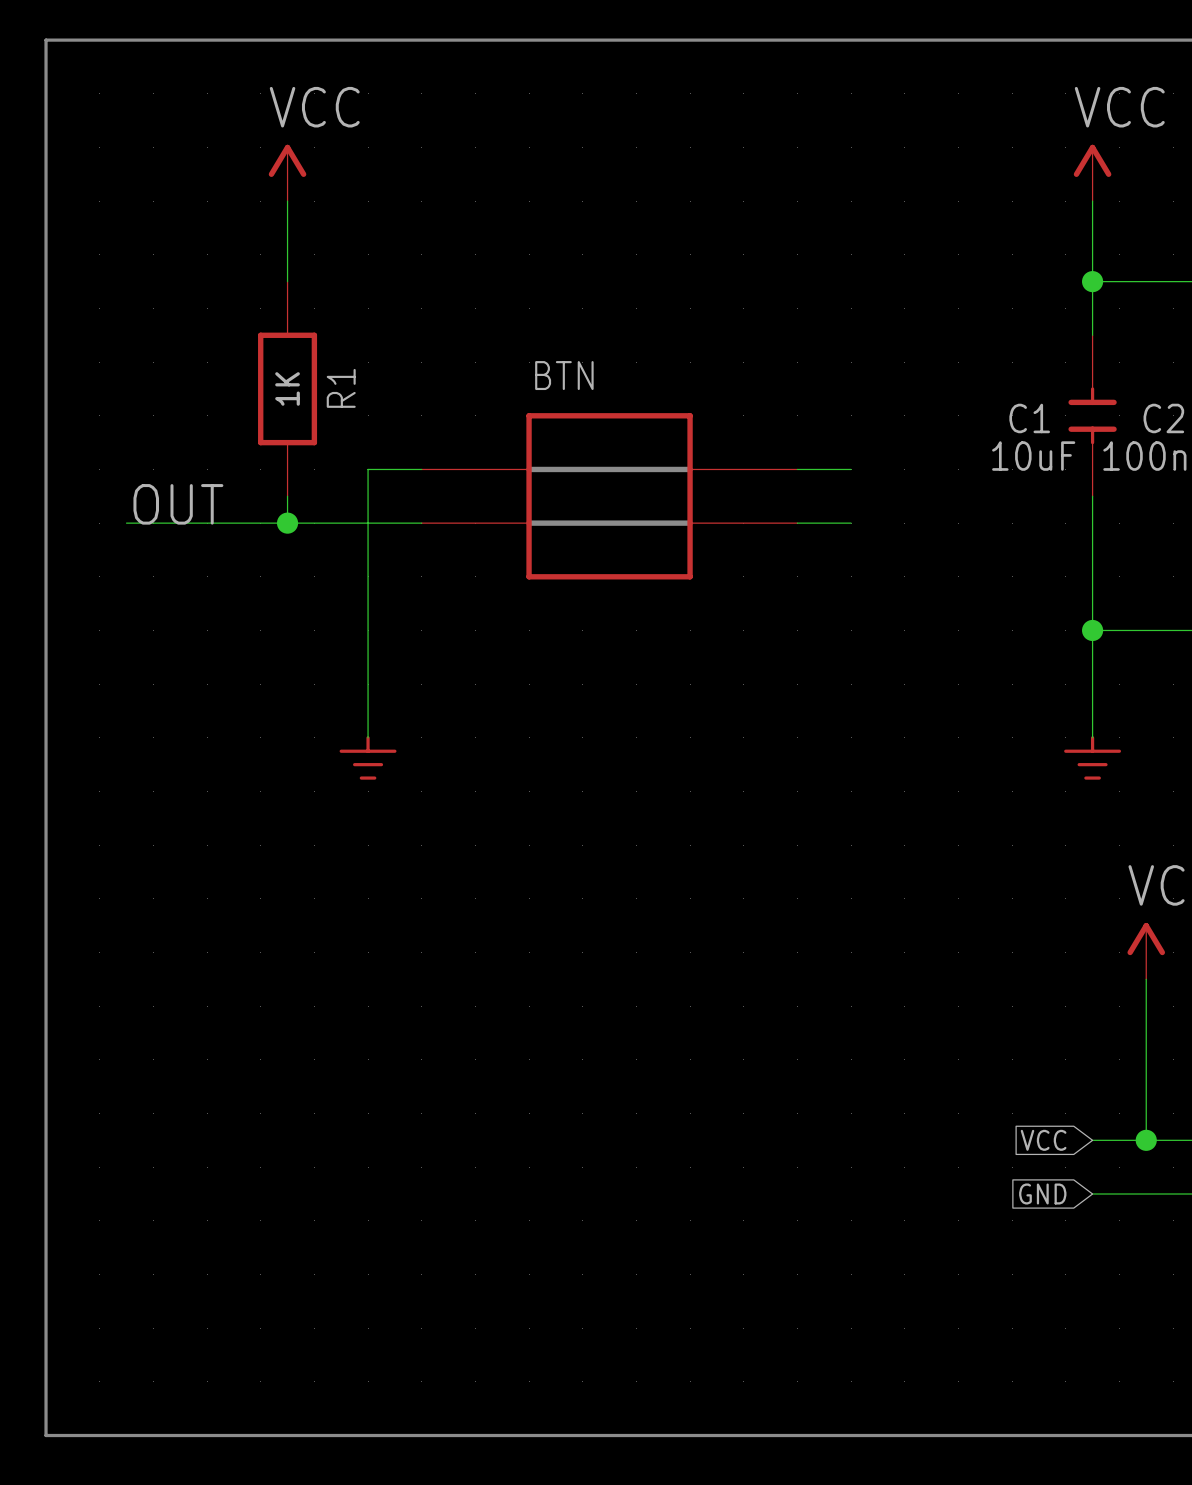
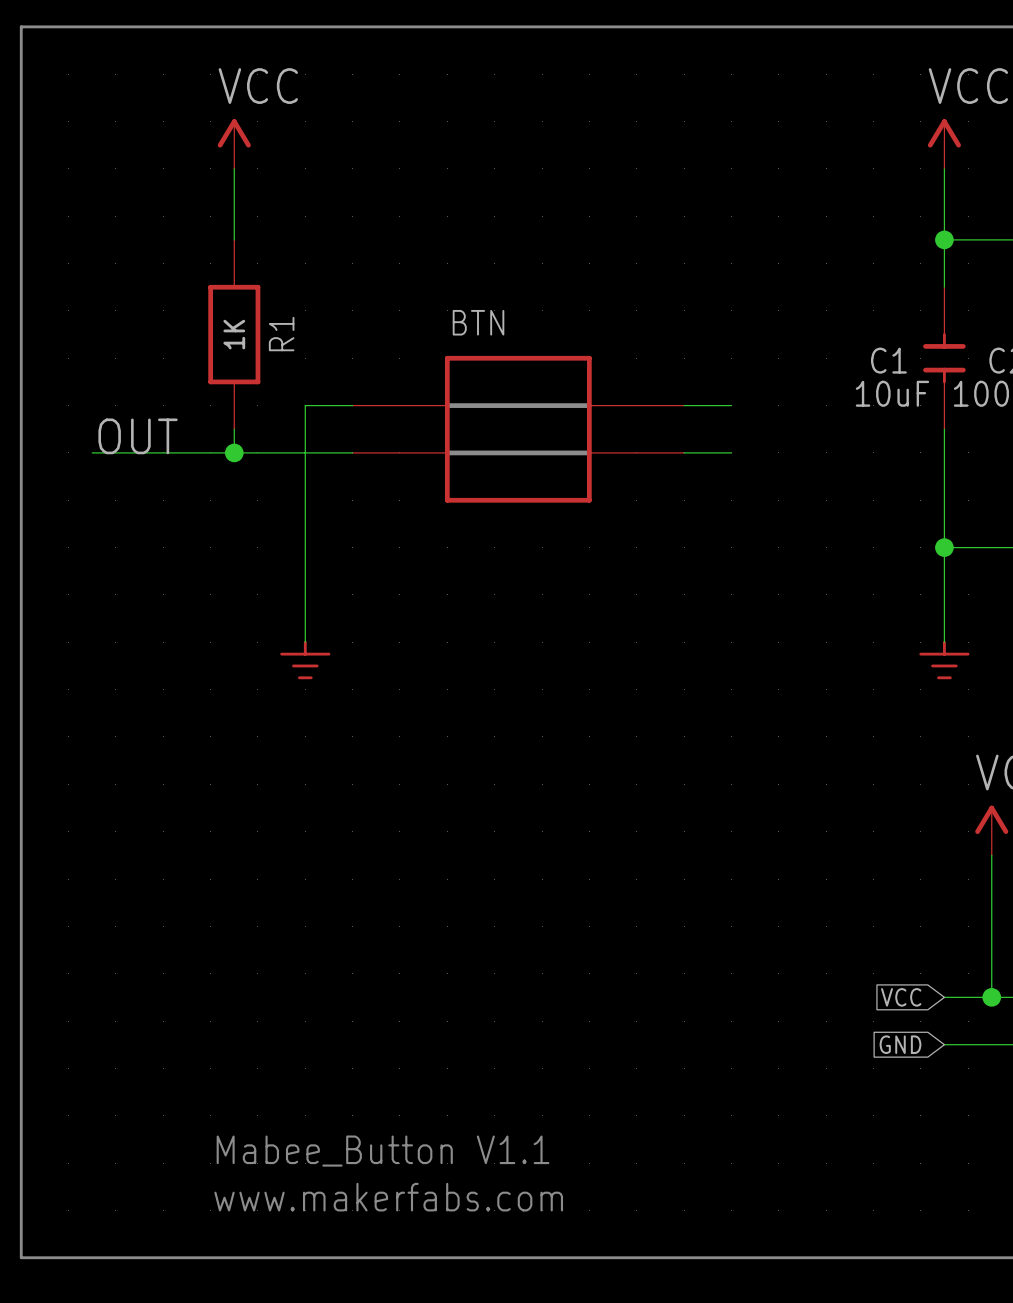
text: none -> Mabee_Button V1.1 (383, 1151)
text: none -> www.makerfabs.com (388, 1197)

